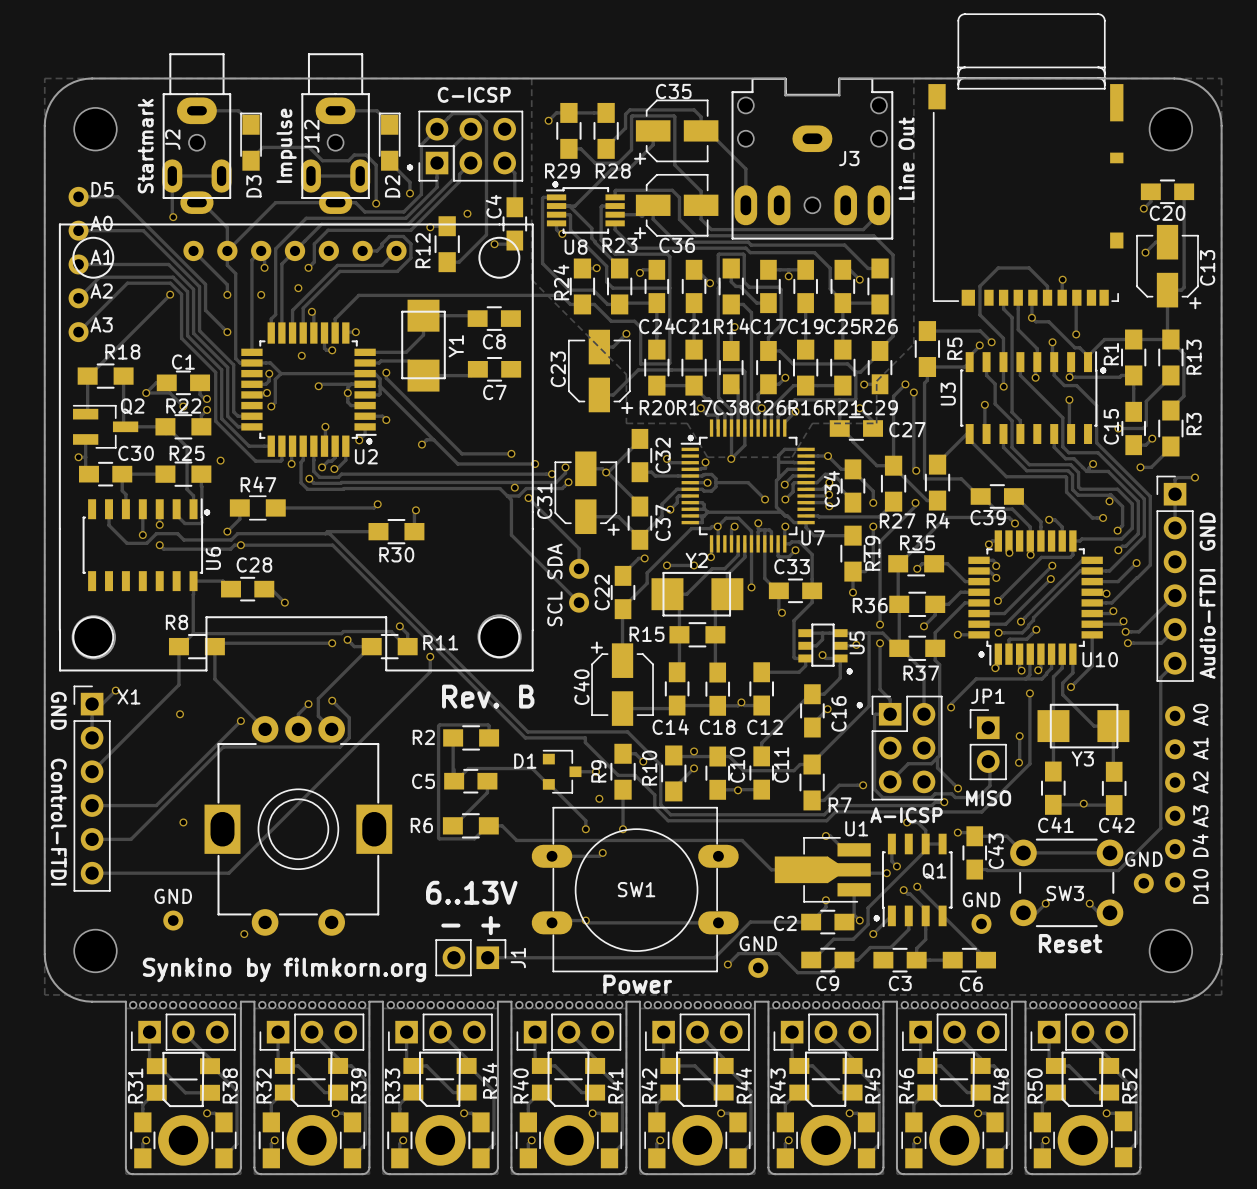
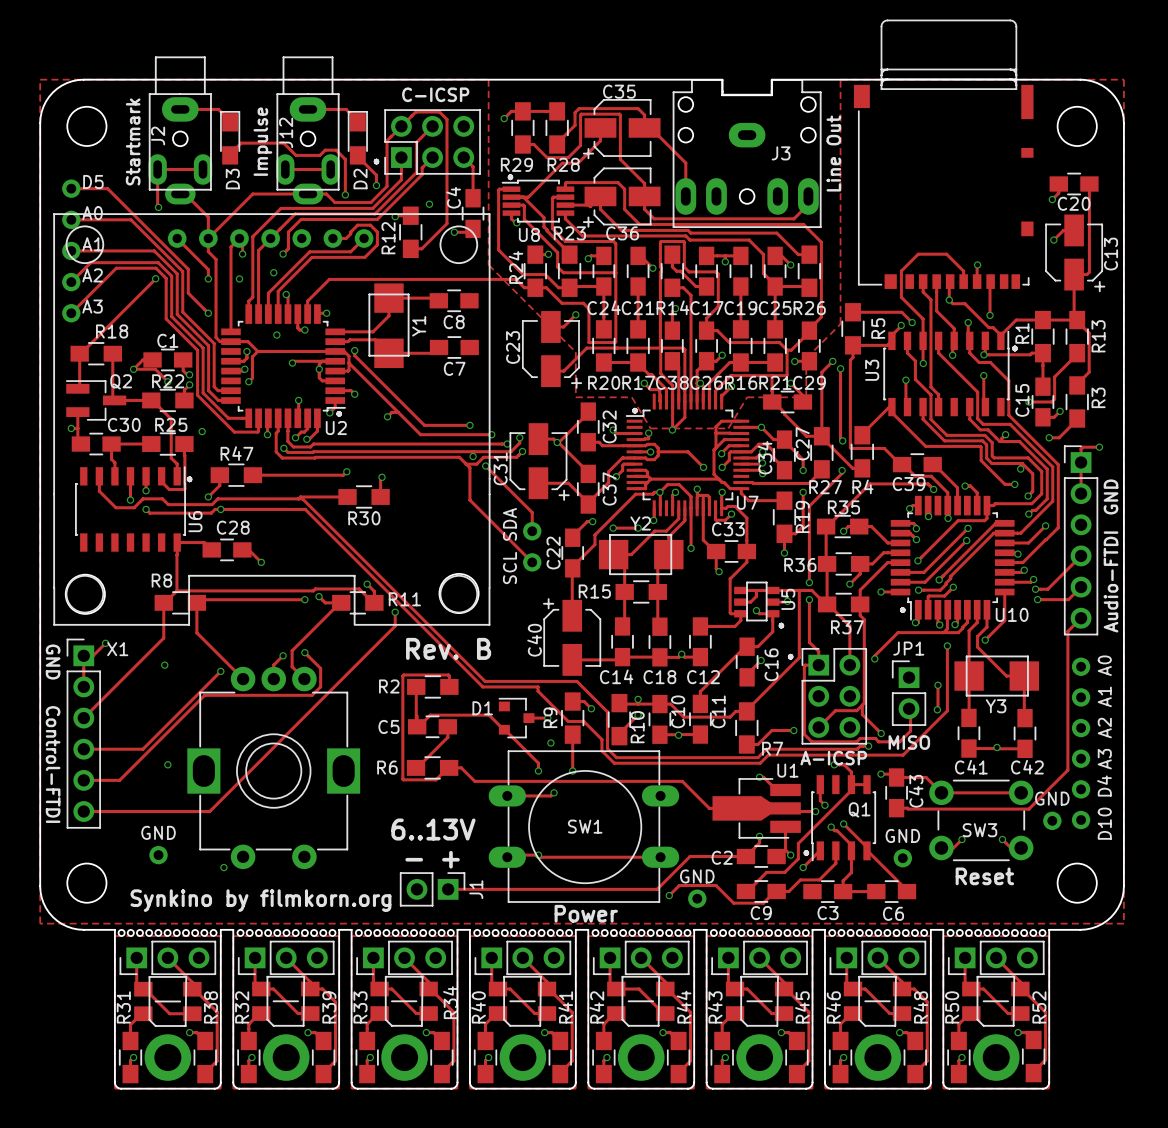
C27 name rotation: 0° (907, 429) -> 90° counterclockwise (802, 443)
C27 name position: C27 (907, 429) -> C27 (802, 443)
R10 name position: R10 (649, 768) -> R10 (637, 727)

